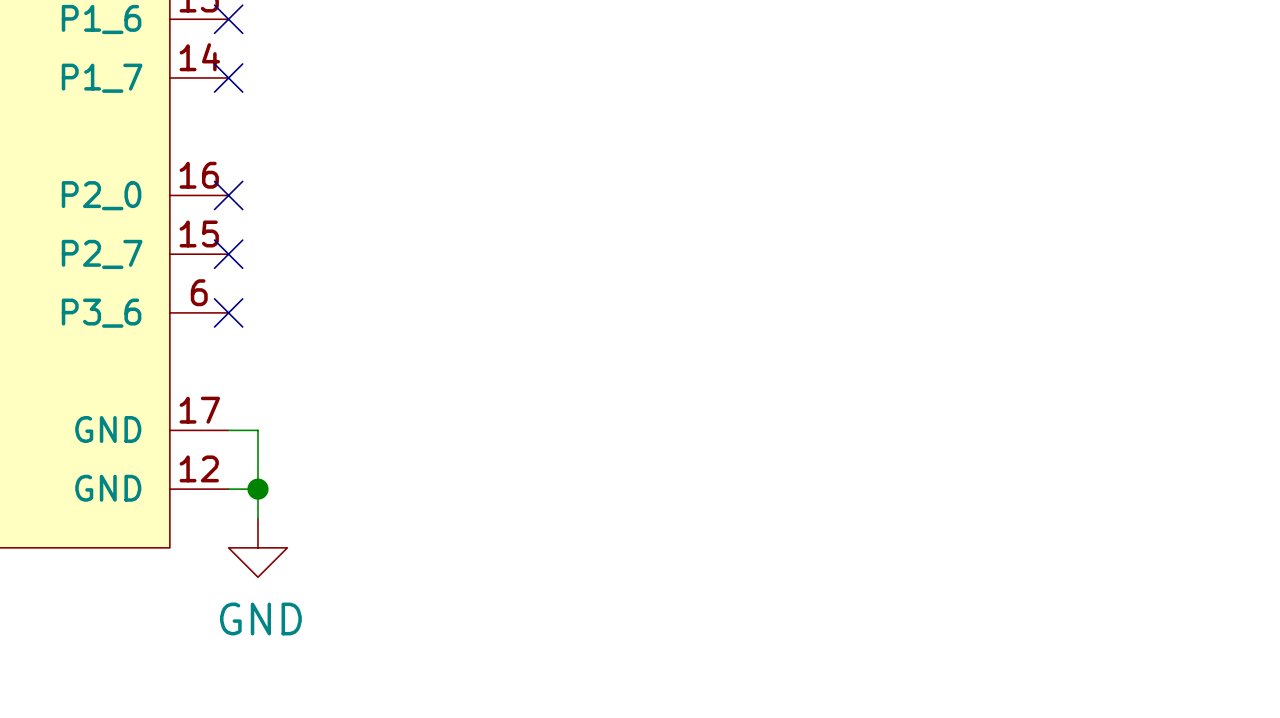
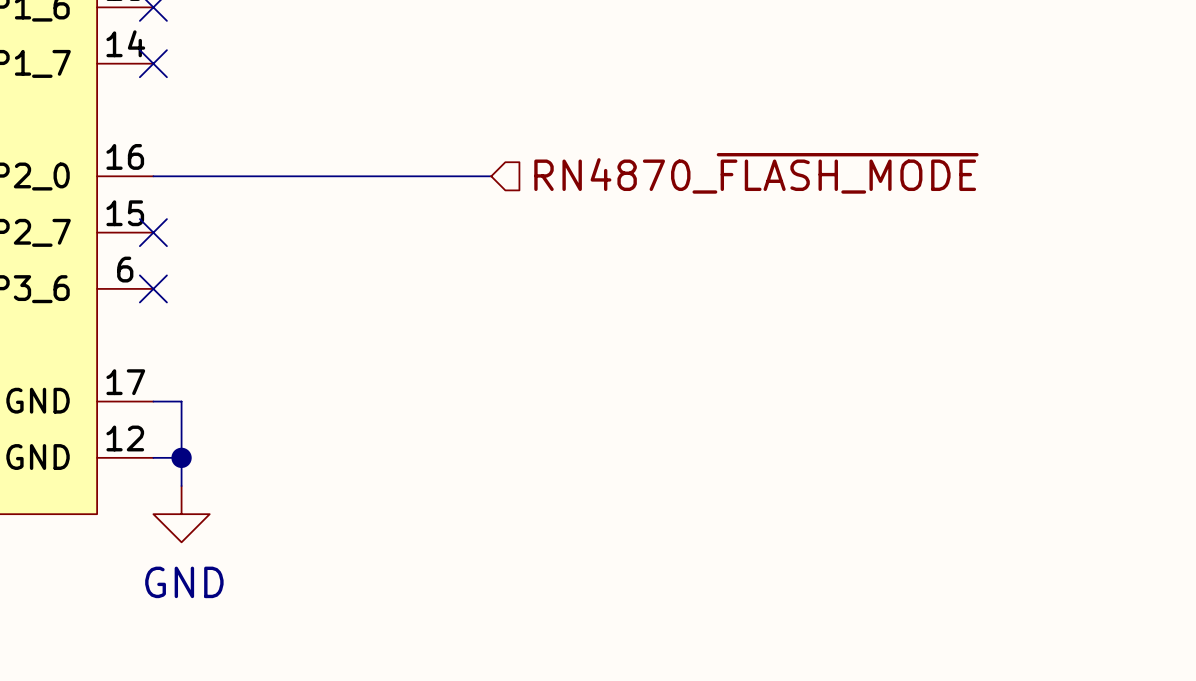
hierarchical label: none -> RN4870_~{FLASH_MODE} (756, 173)
wire: none -> (153, 176) (491, 176)
no-connect mark: (228, 195) -> none

